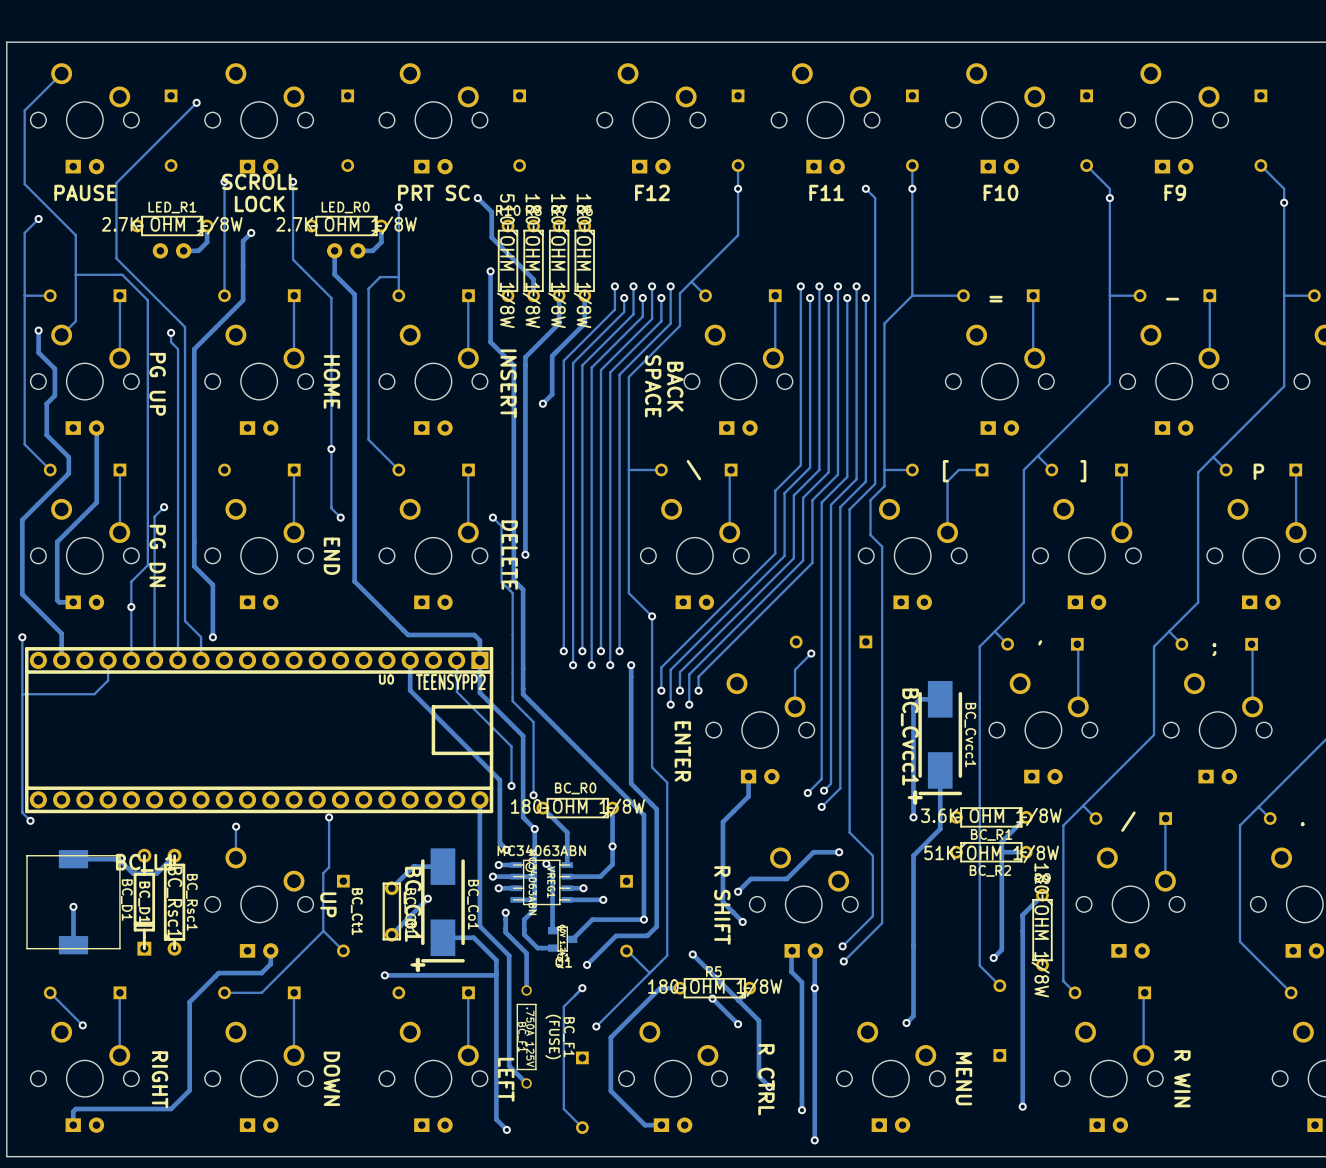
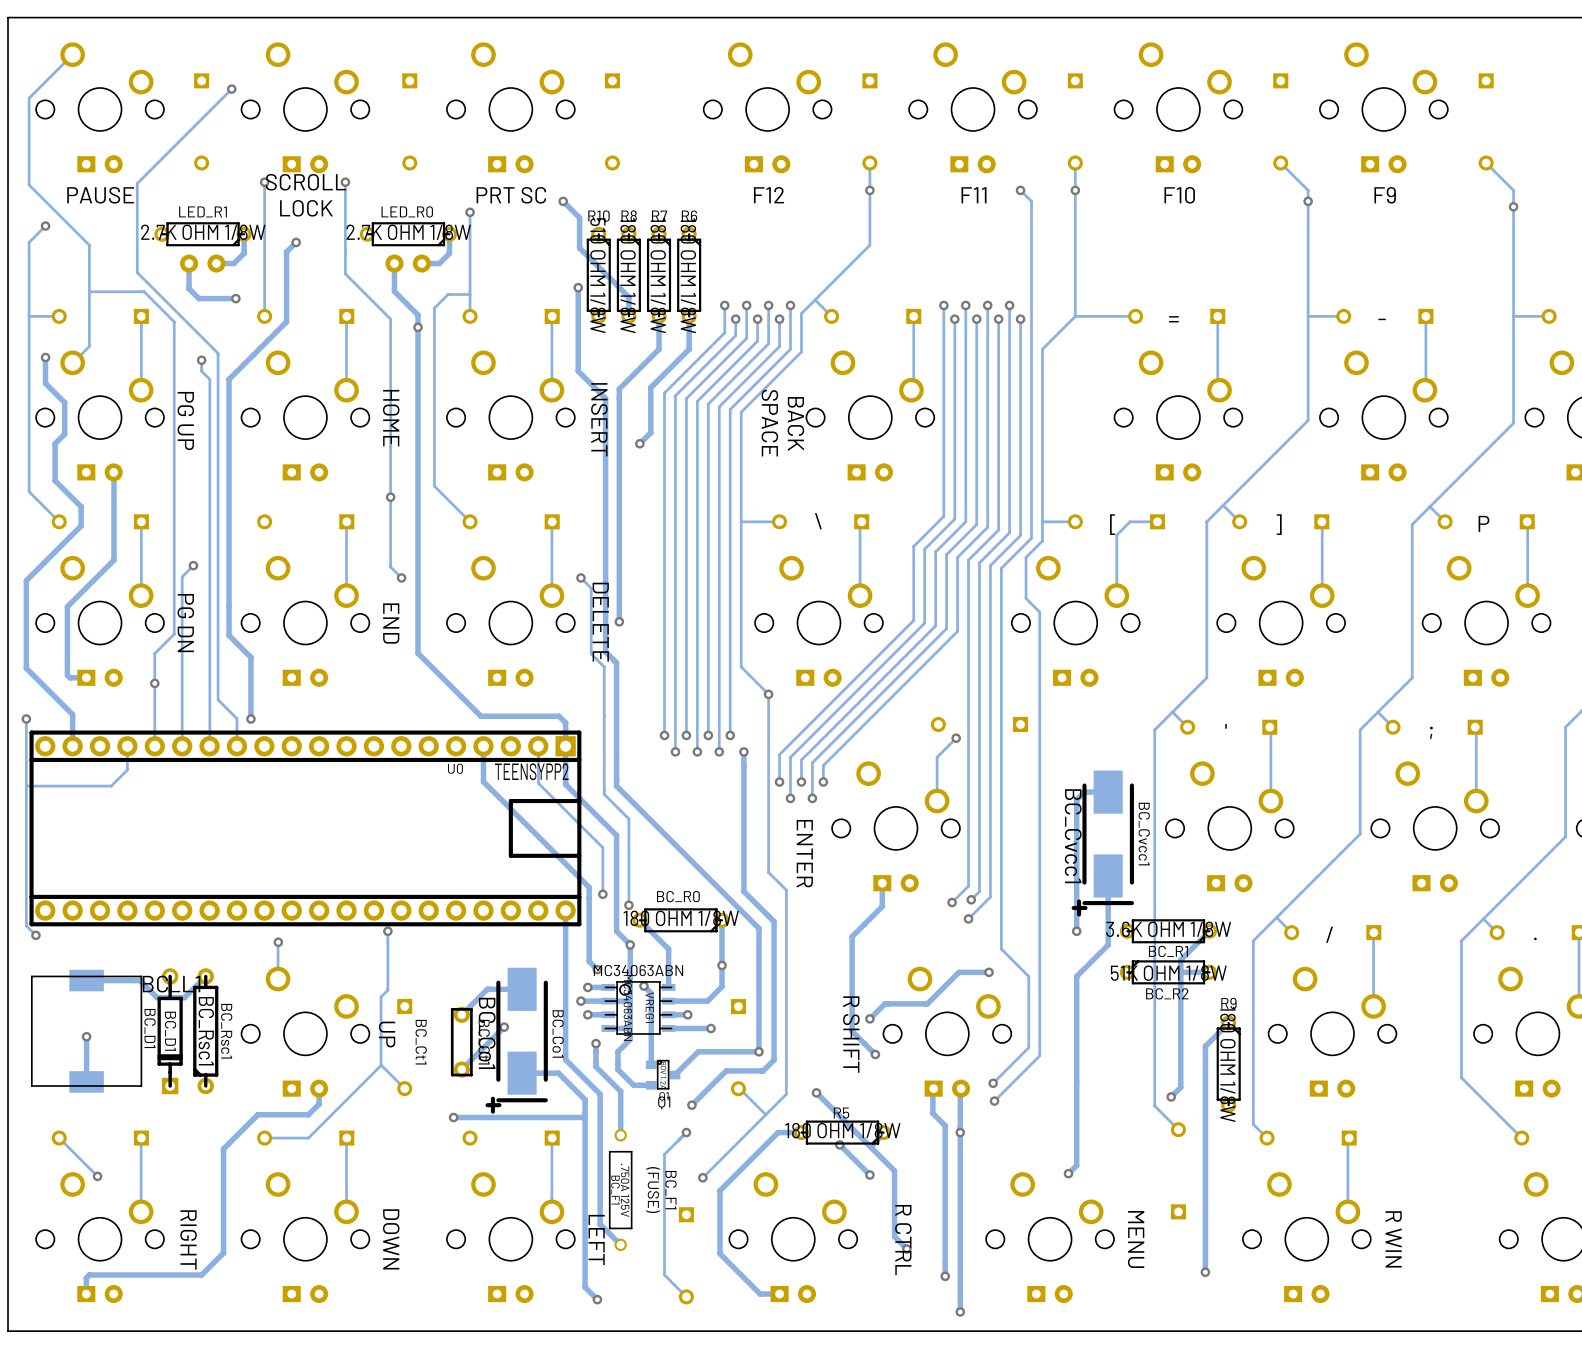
track: none -> (189, 263) (189, 288) (198, 298) (235, 298)
via: none -> (235, 298)
via: none -> (418, 327)

